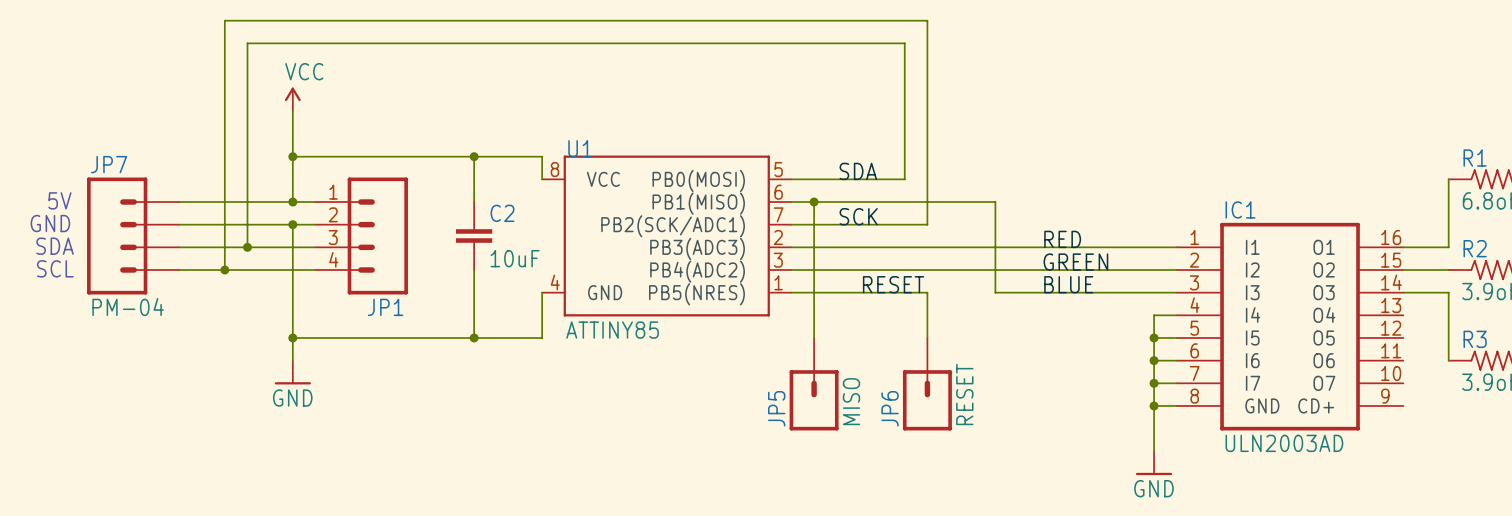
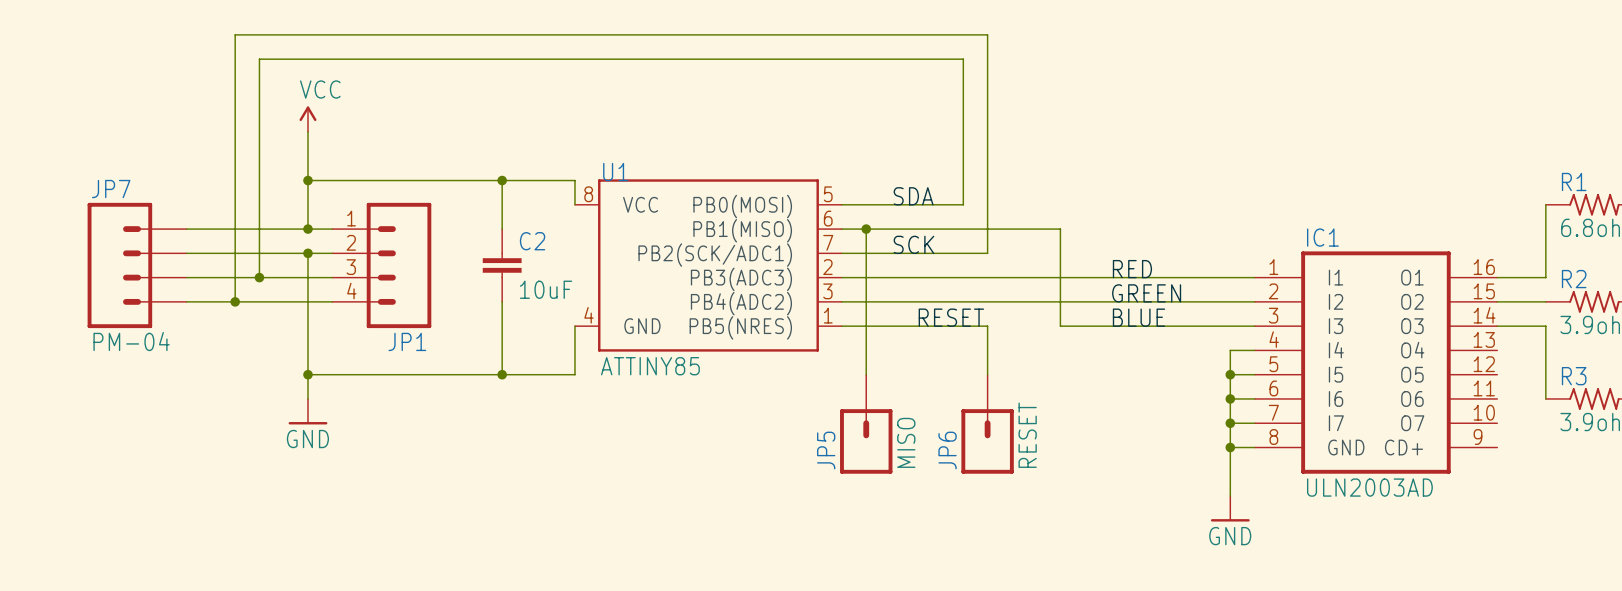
text: 5V (59, 200) -> none
text: GND (50, 223) -> none
text: SDA (55, 246) -> none
text: SCL (55, 268) -> none

